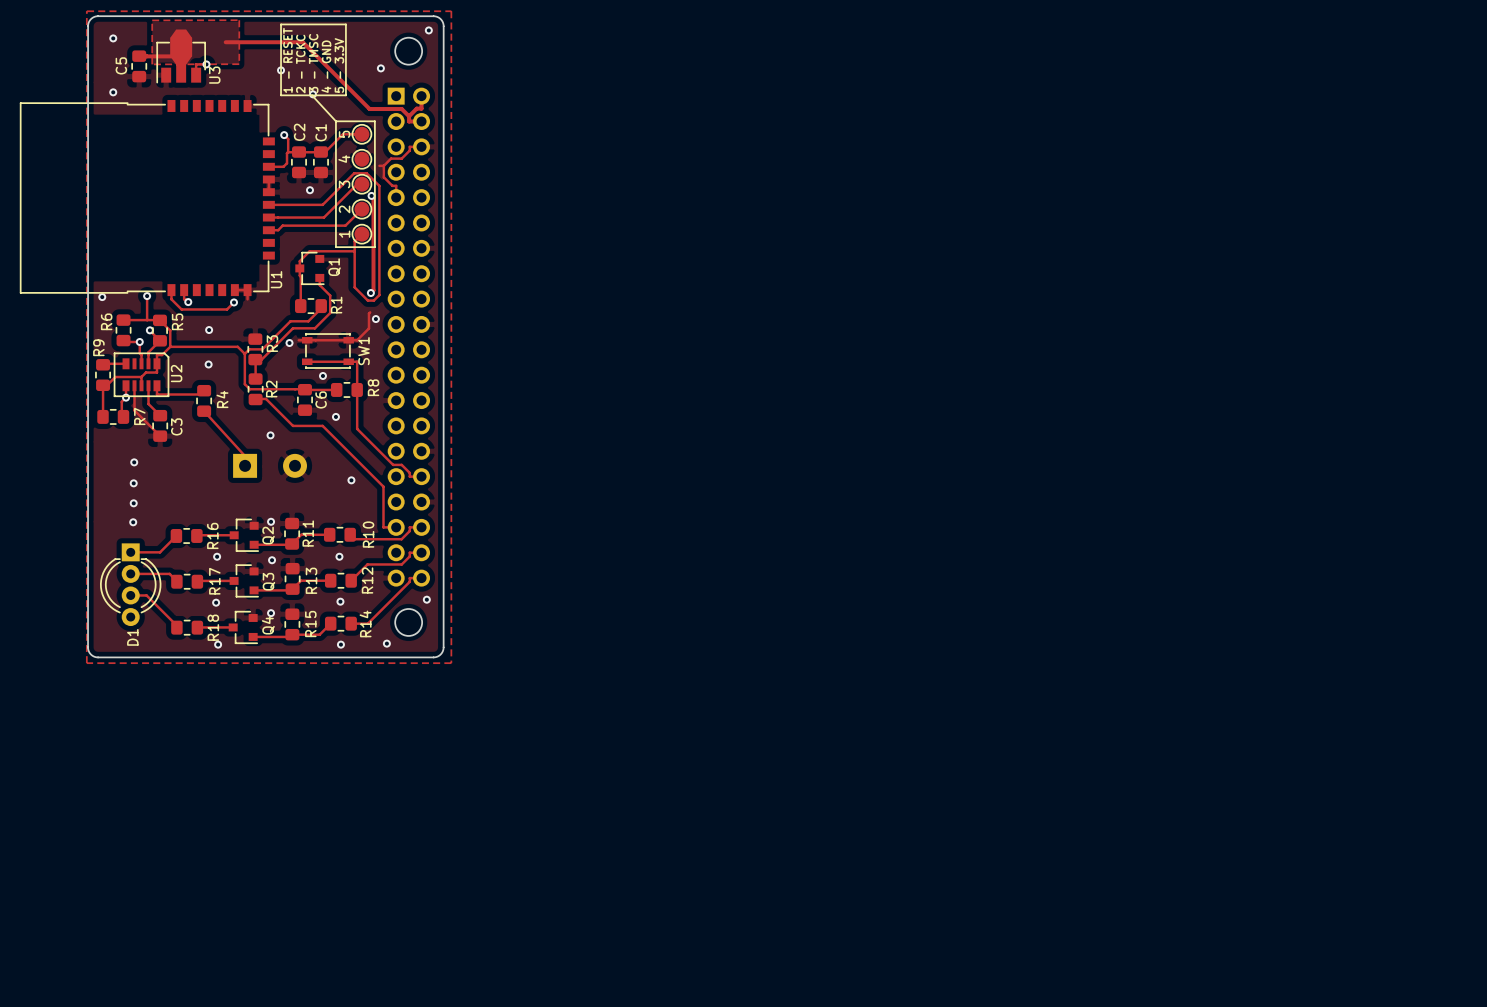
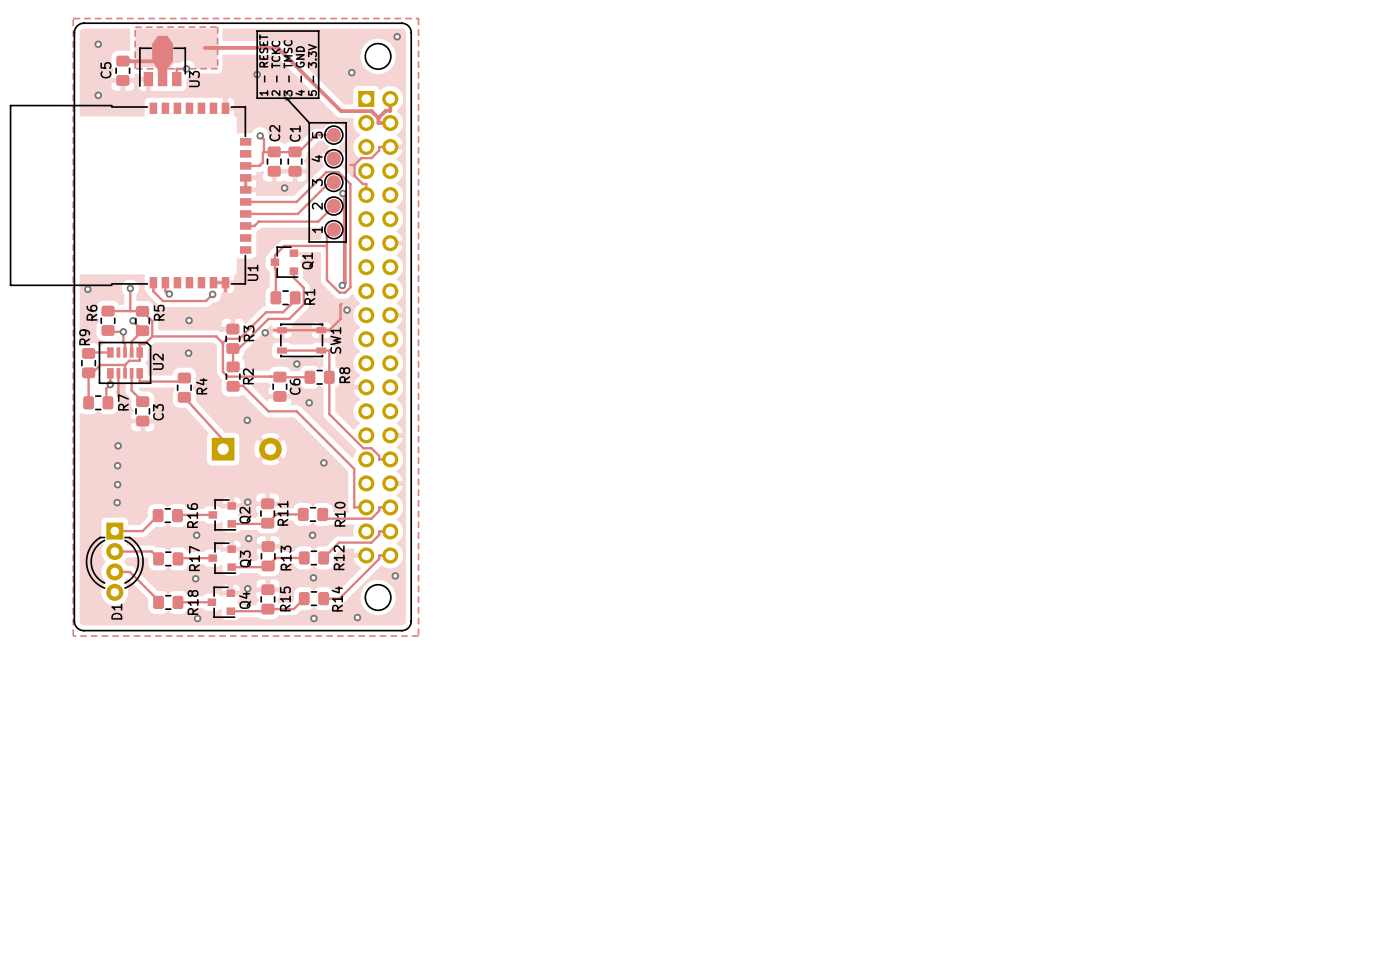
track: (134, 410) (160, 436) -> none

